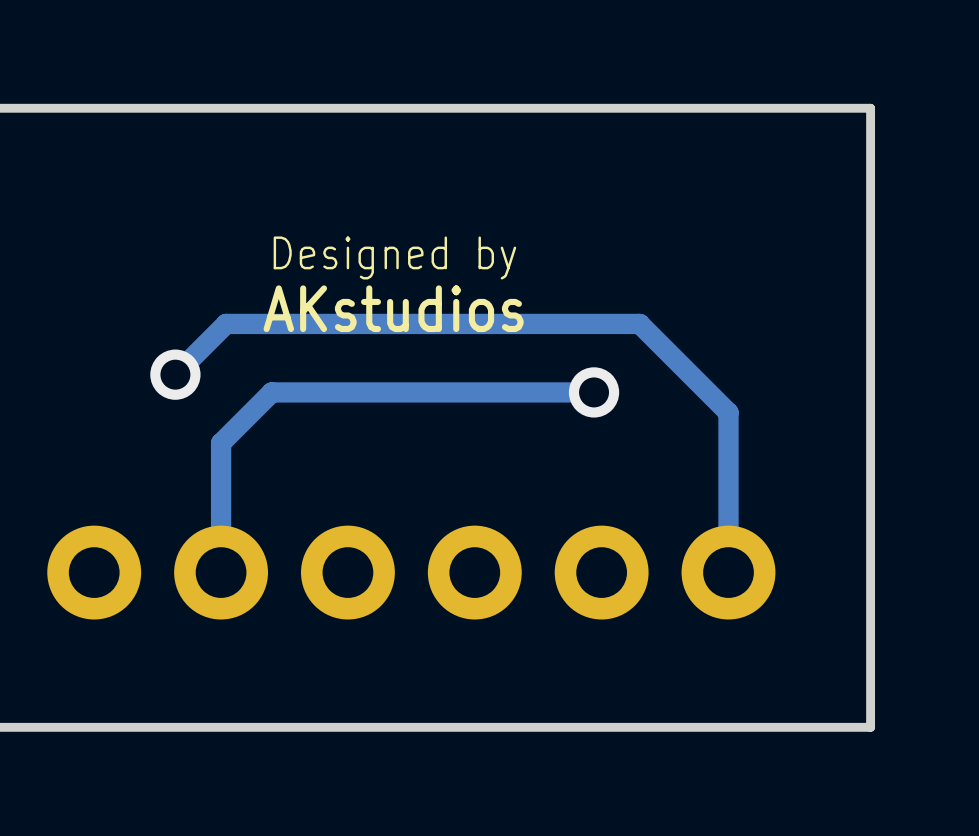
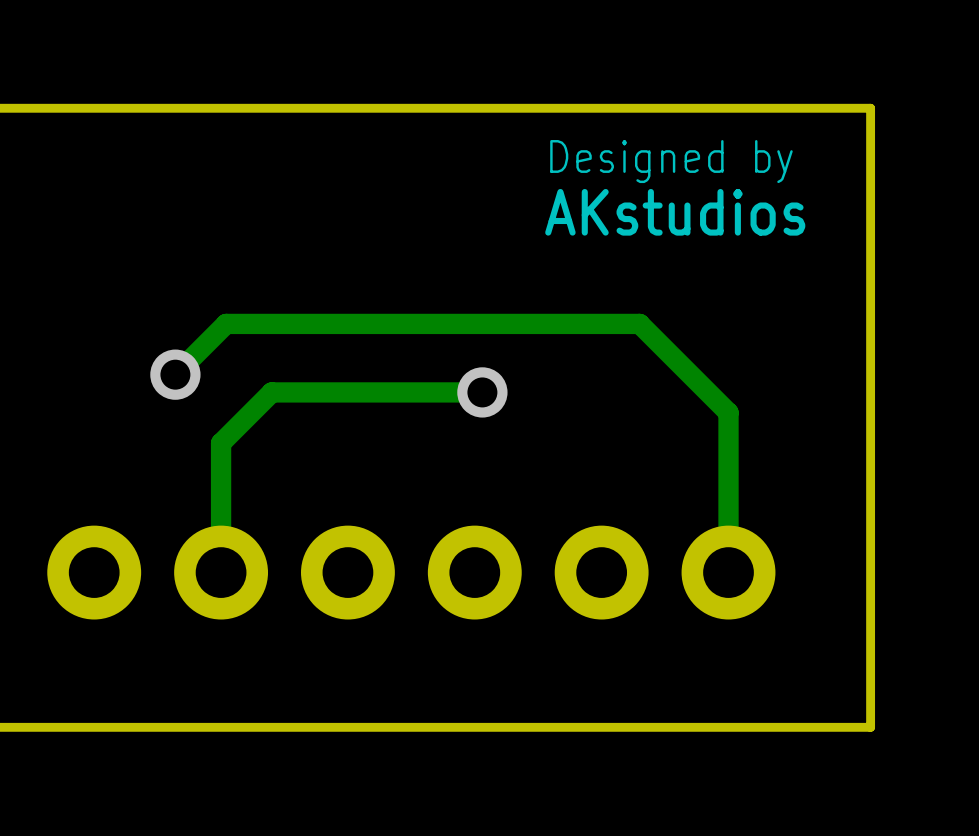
text position: Designed by (394, 257) -> Designed by (671, 161)
text position: AKstudios (393, 308) -> AKstudios (675, 212)
track: (594, 392) (482, 392) -> none
via position: (594, 392) -> (482, 392)

